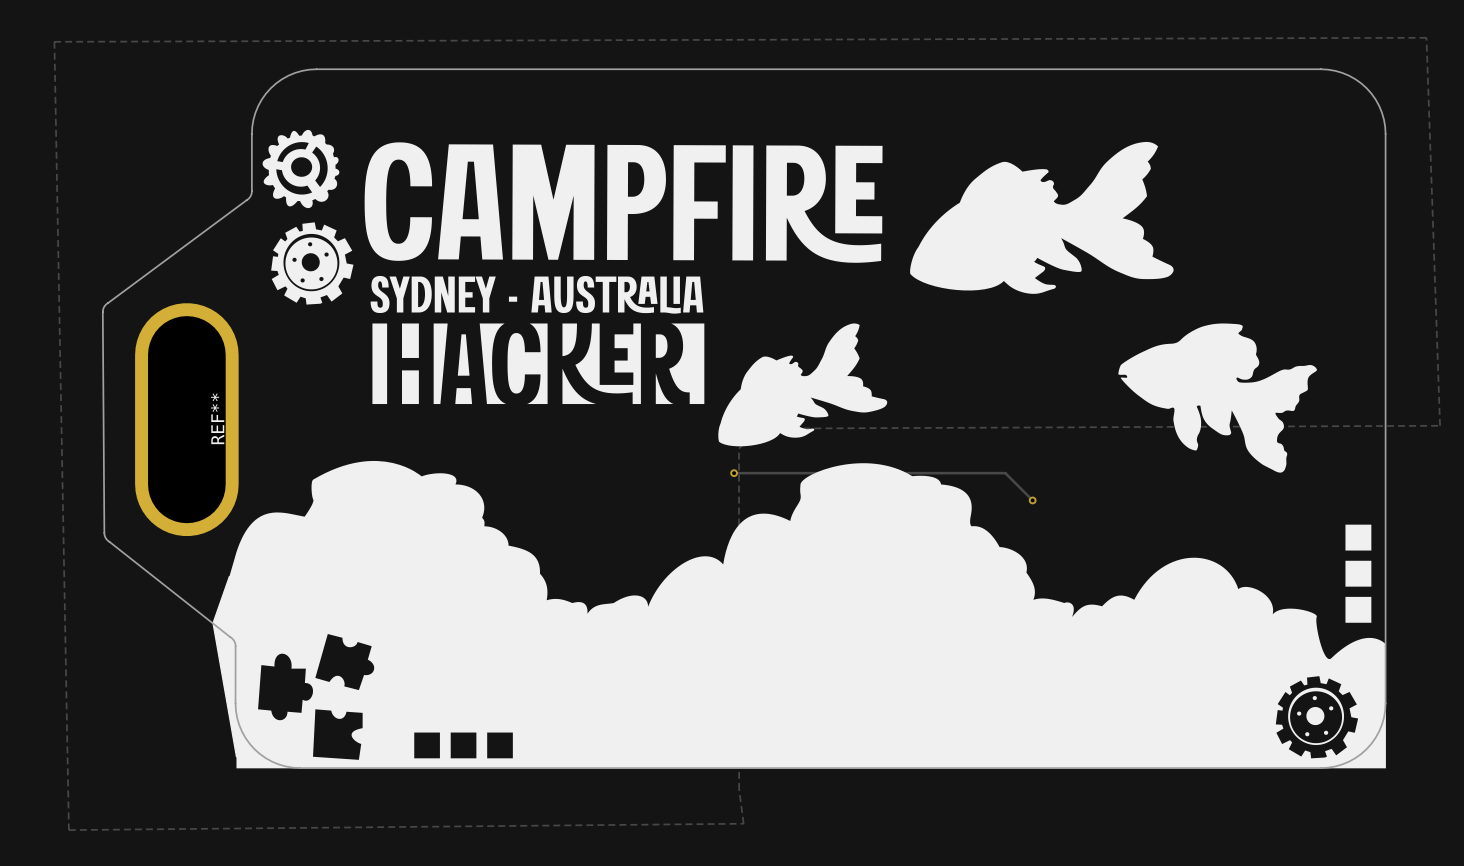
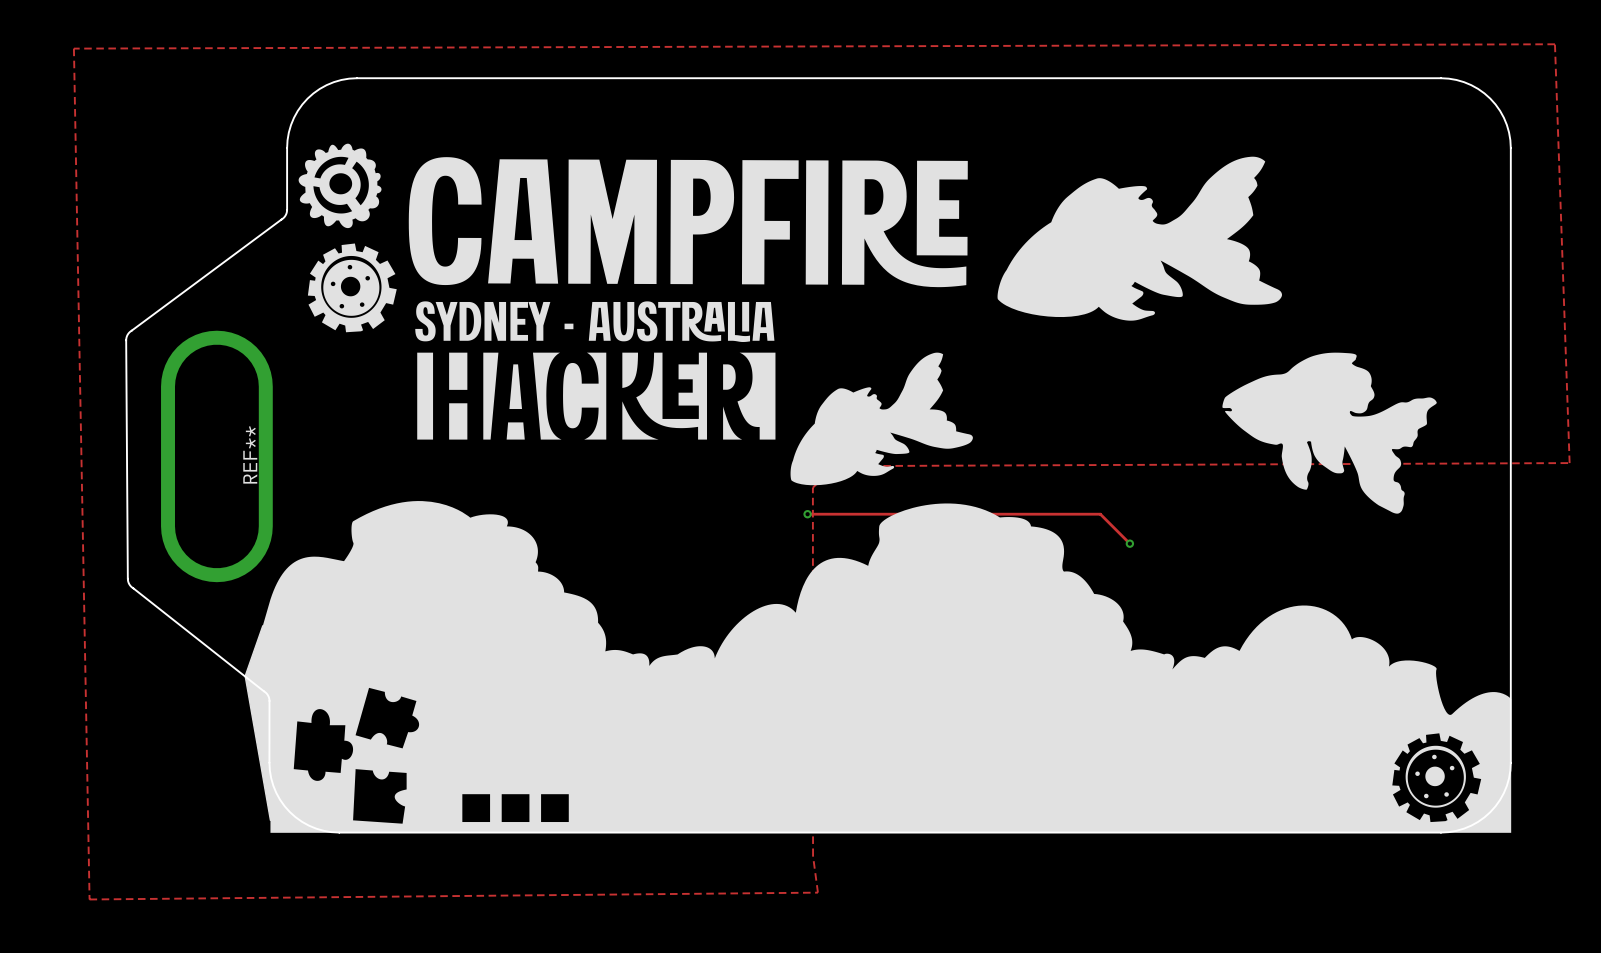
drawing: [1345, 524, 1372, 623] -> none

